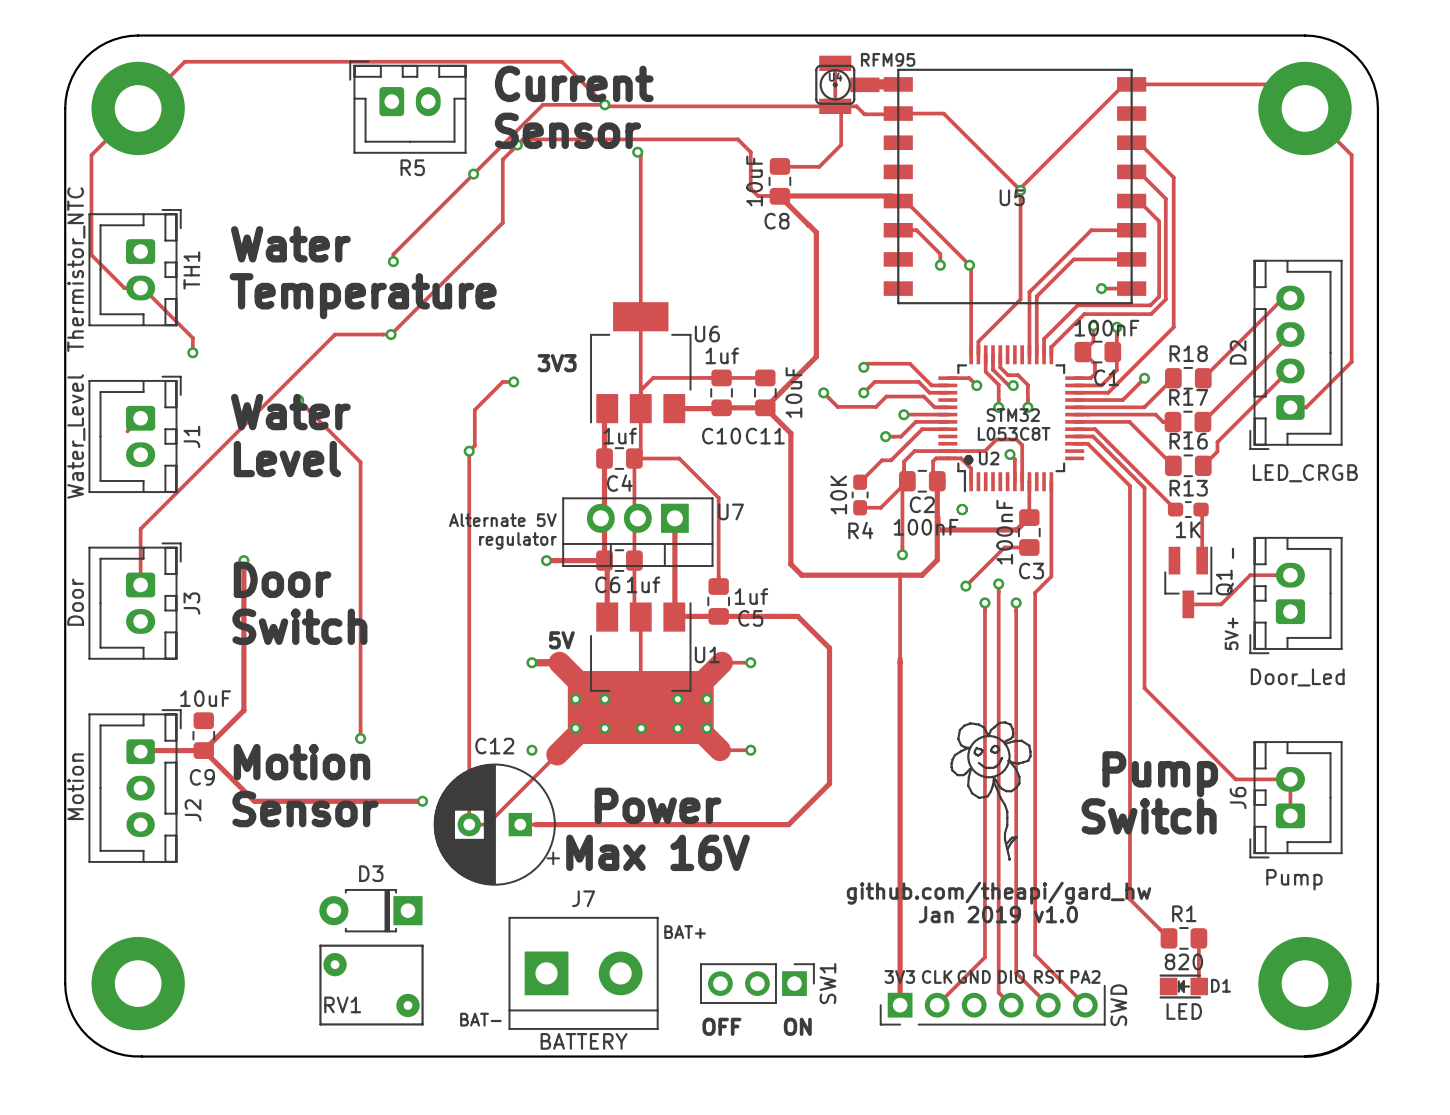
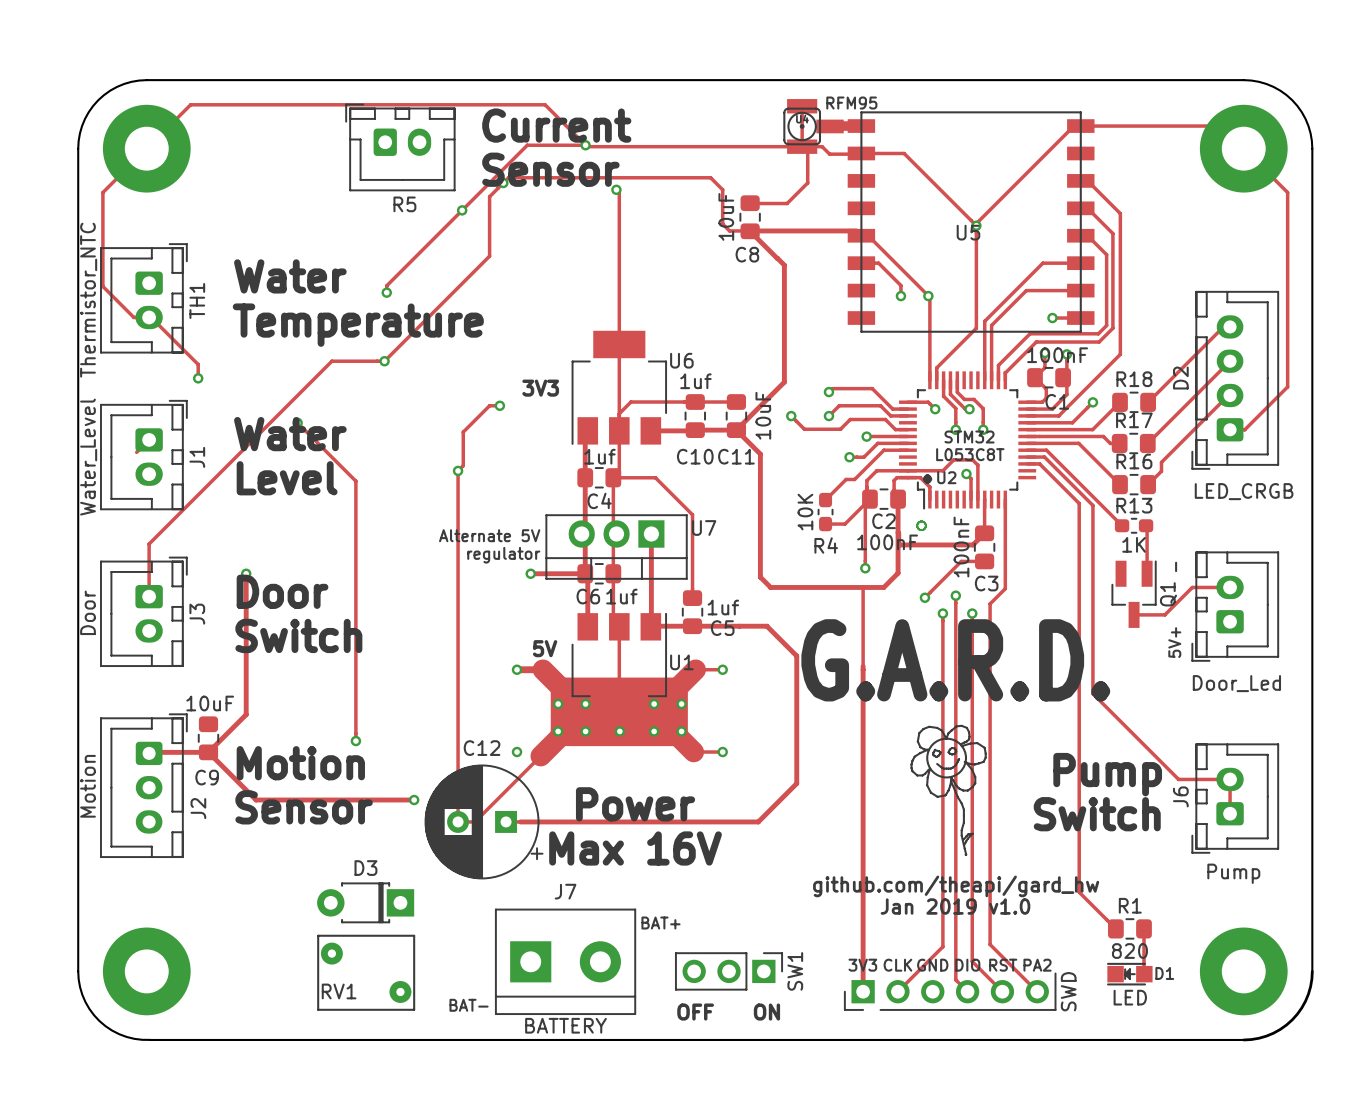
text: none -> G.A.R.D. (955, 660)

